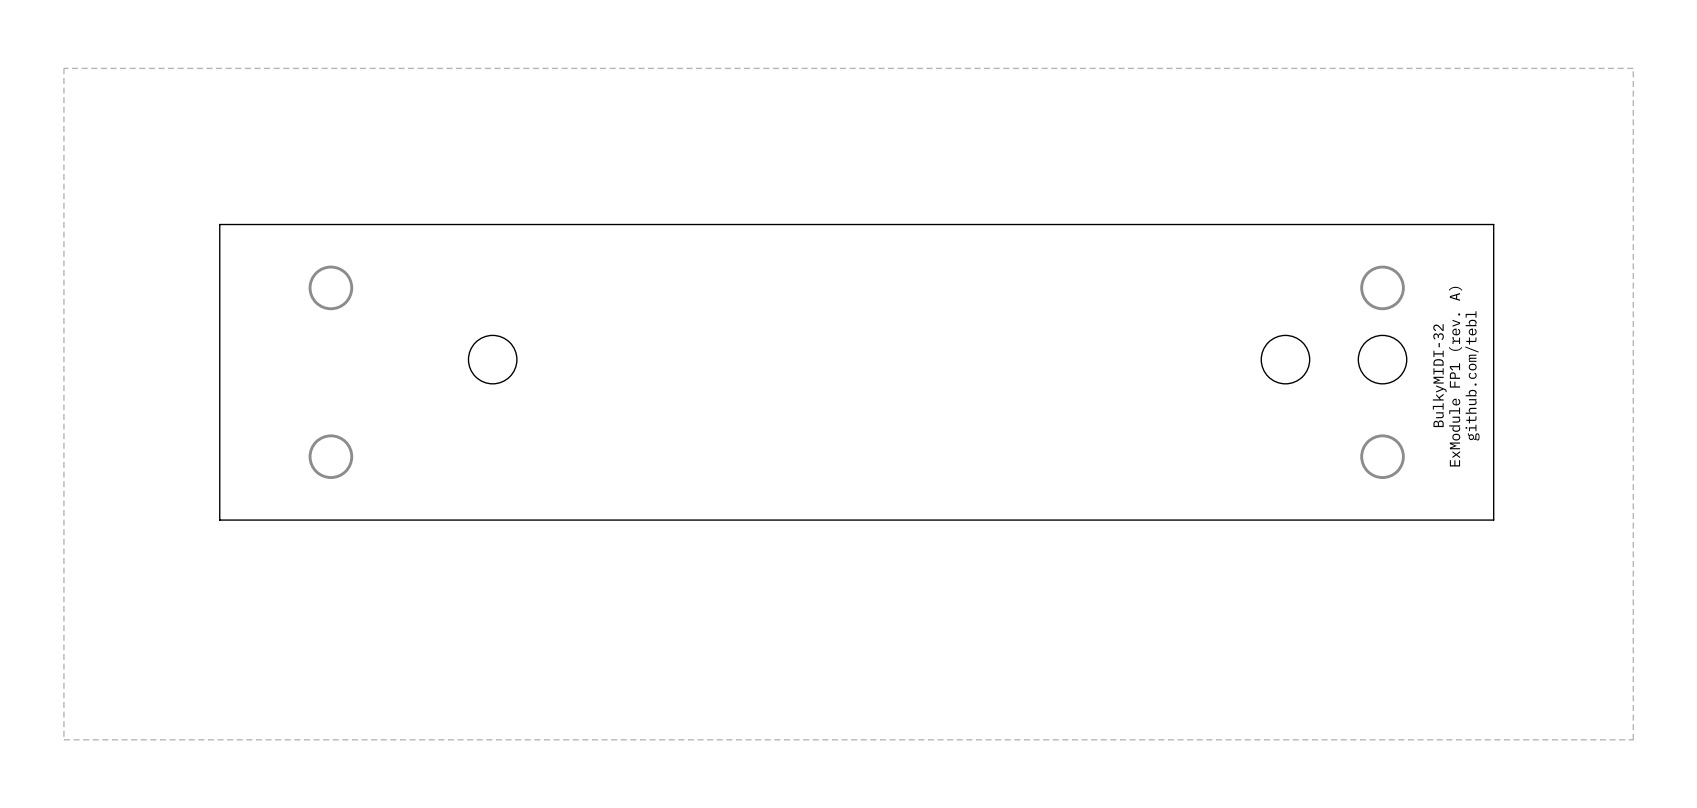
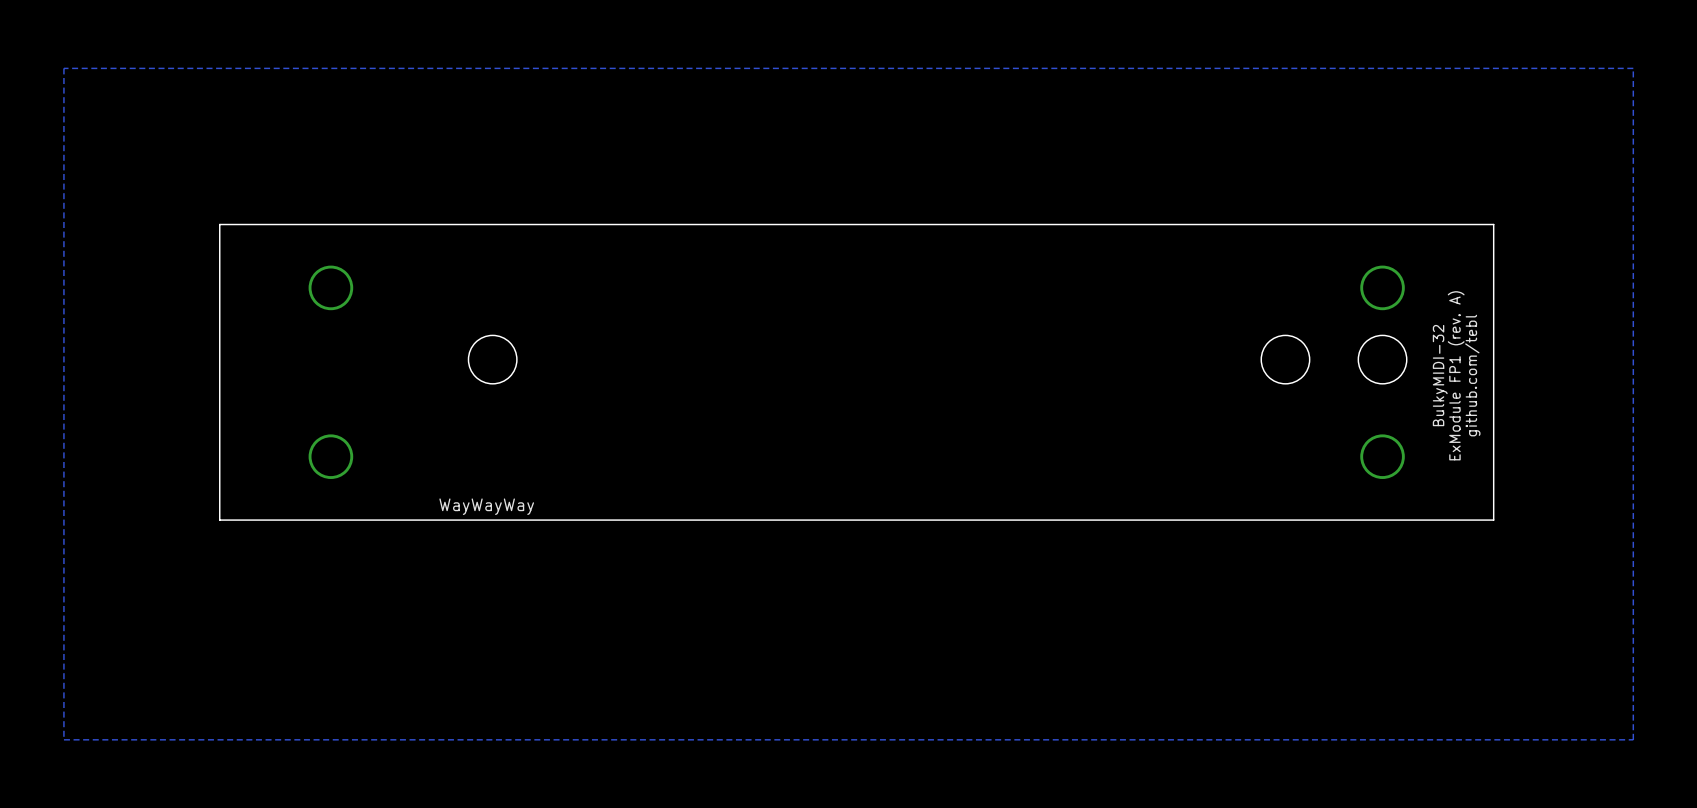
text: none -> WayWayWay (486, 506)

